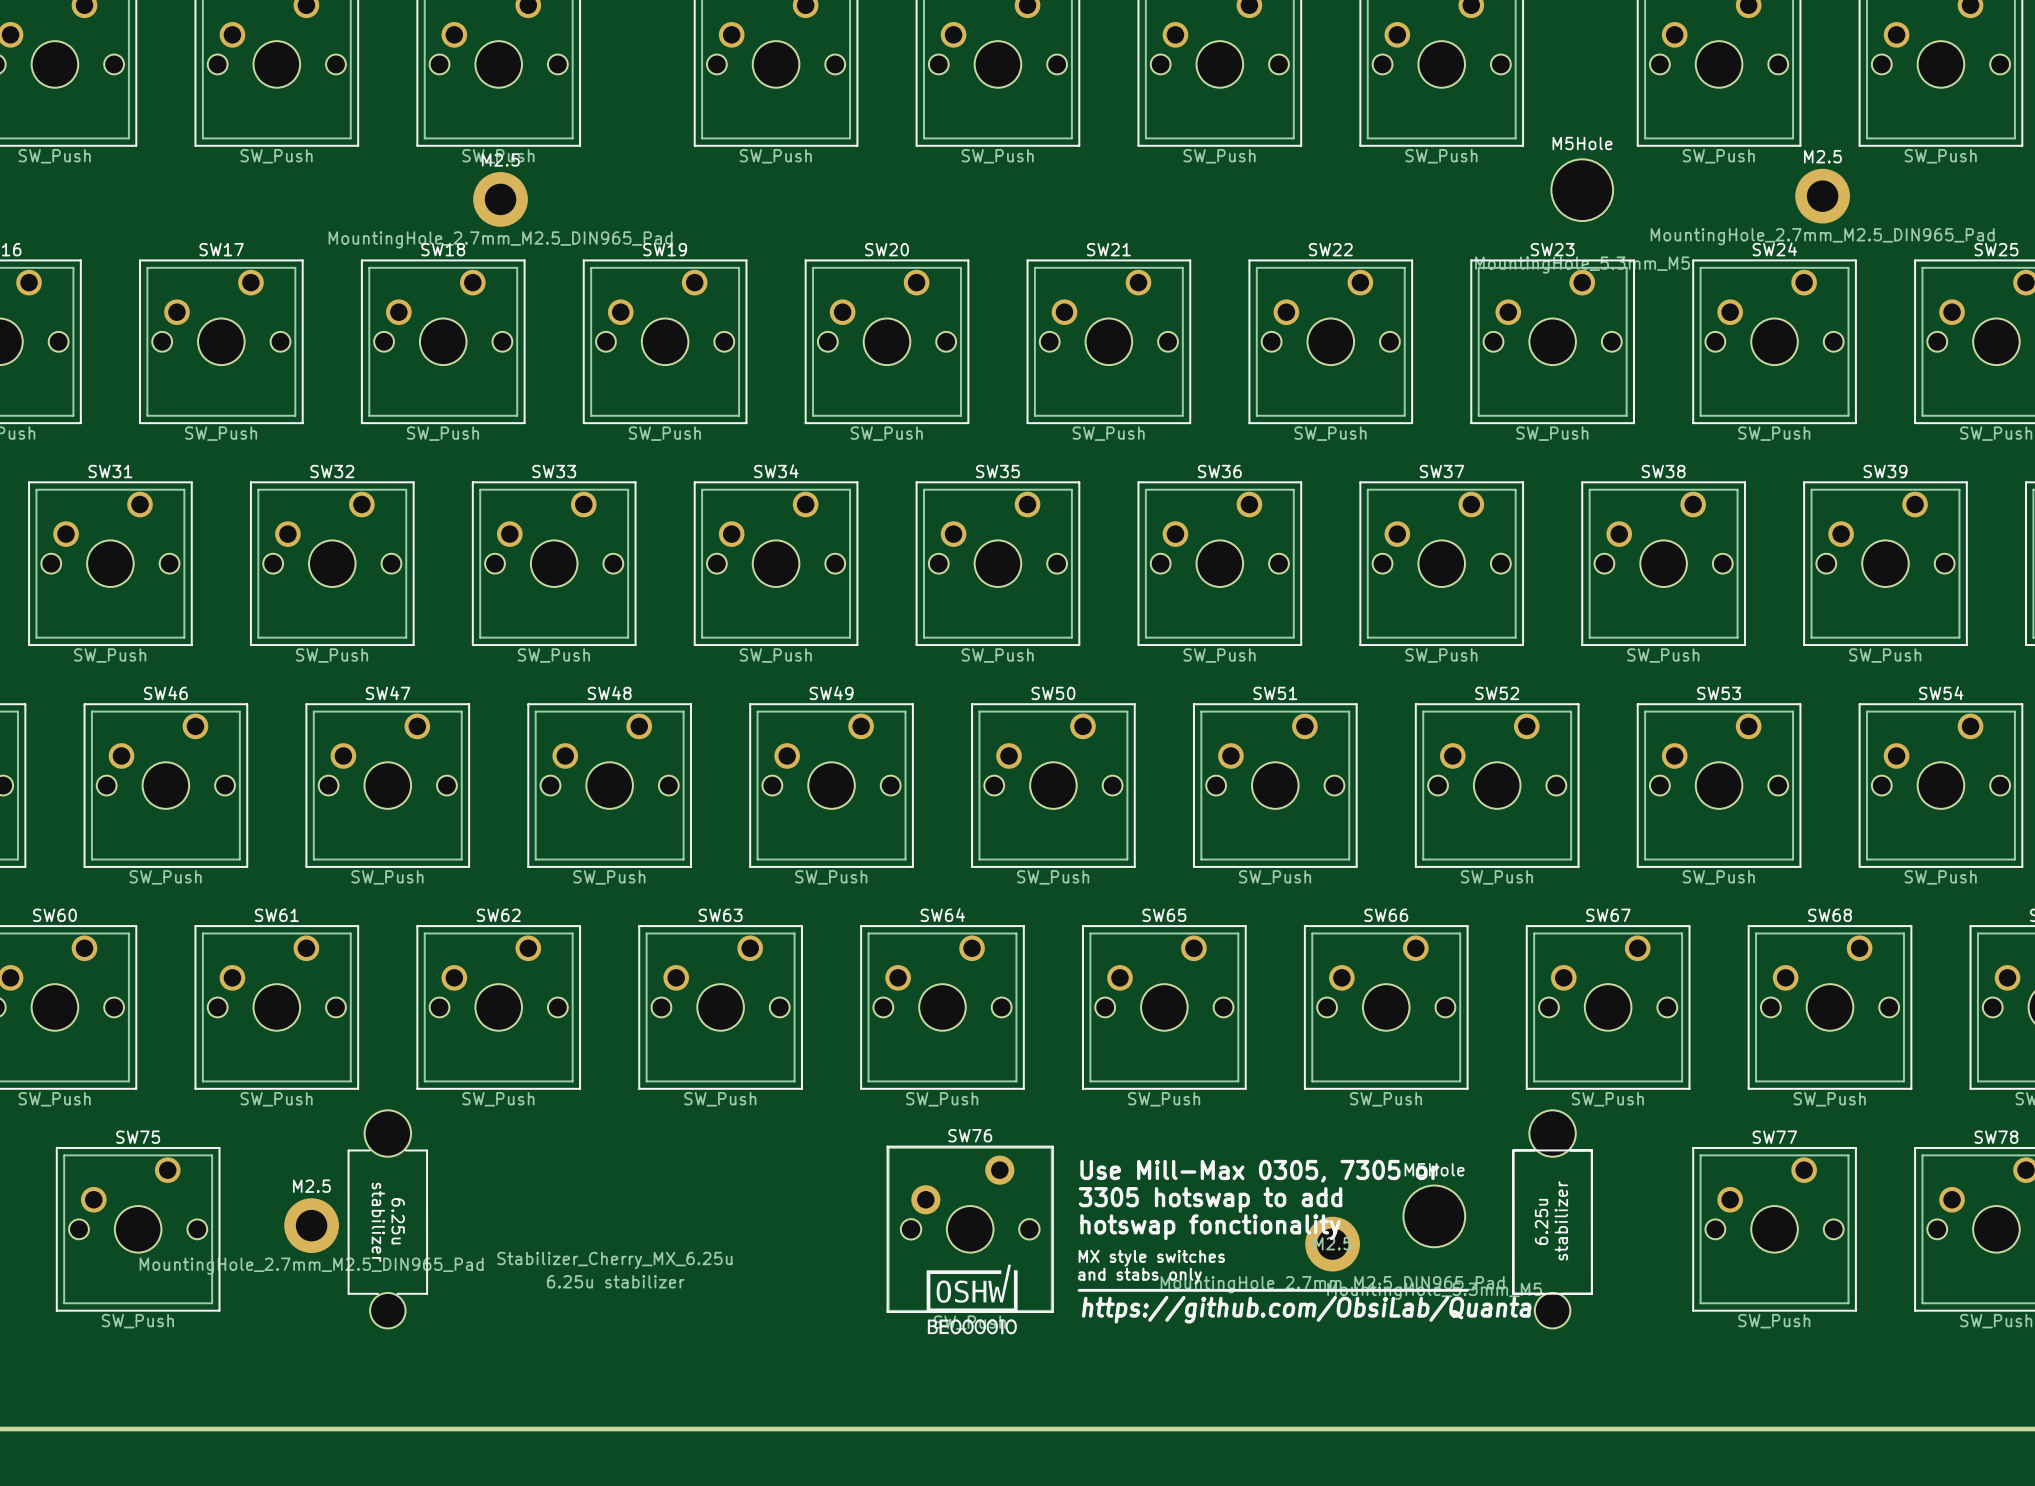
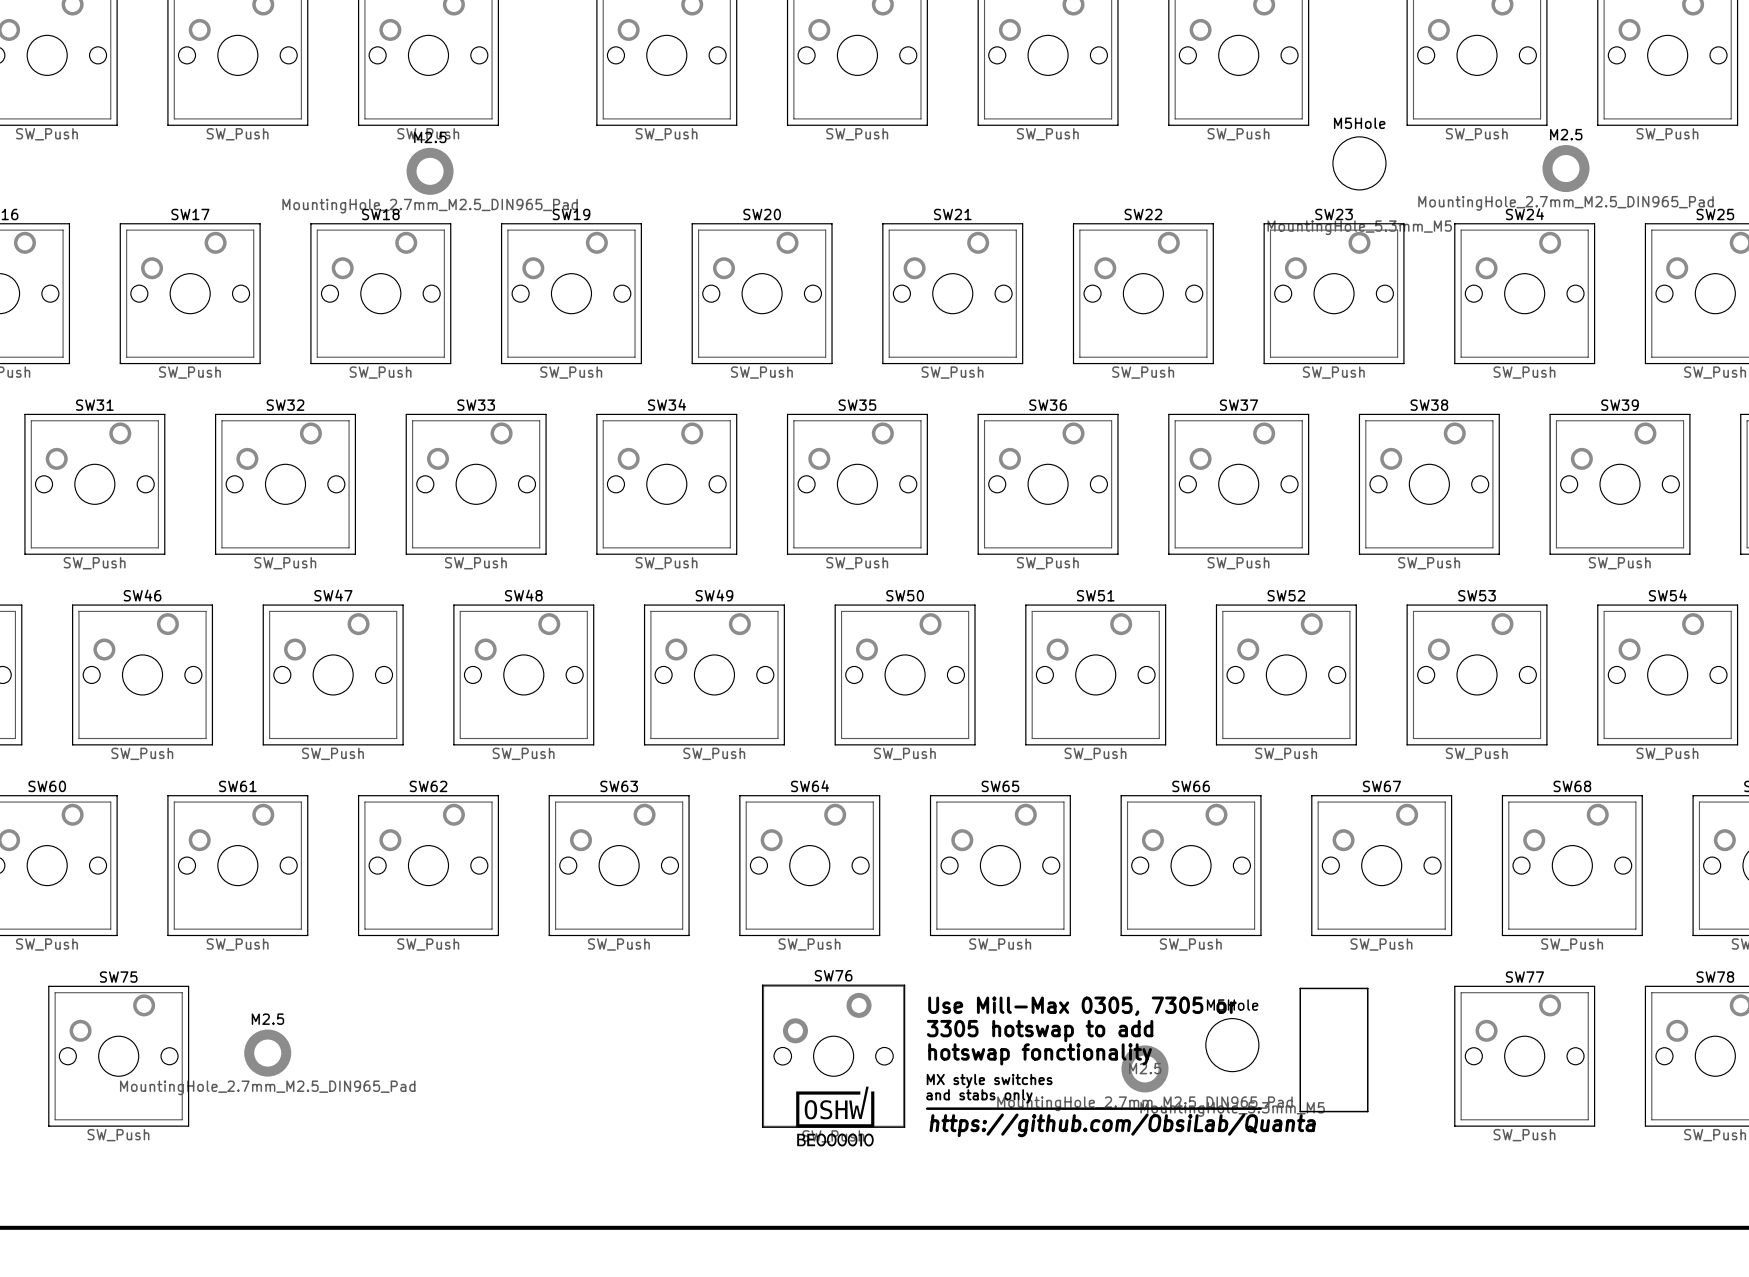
6.25u stabilizer: Stabilizer_Cherry_MX_6.25u (970, 1219) -> none

